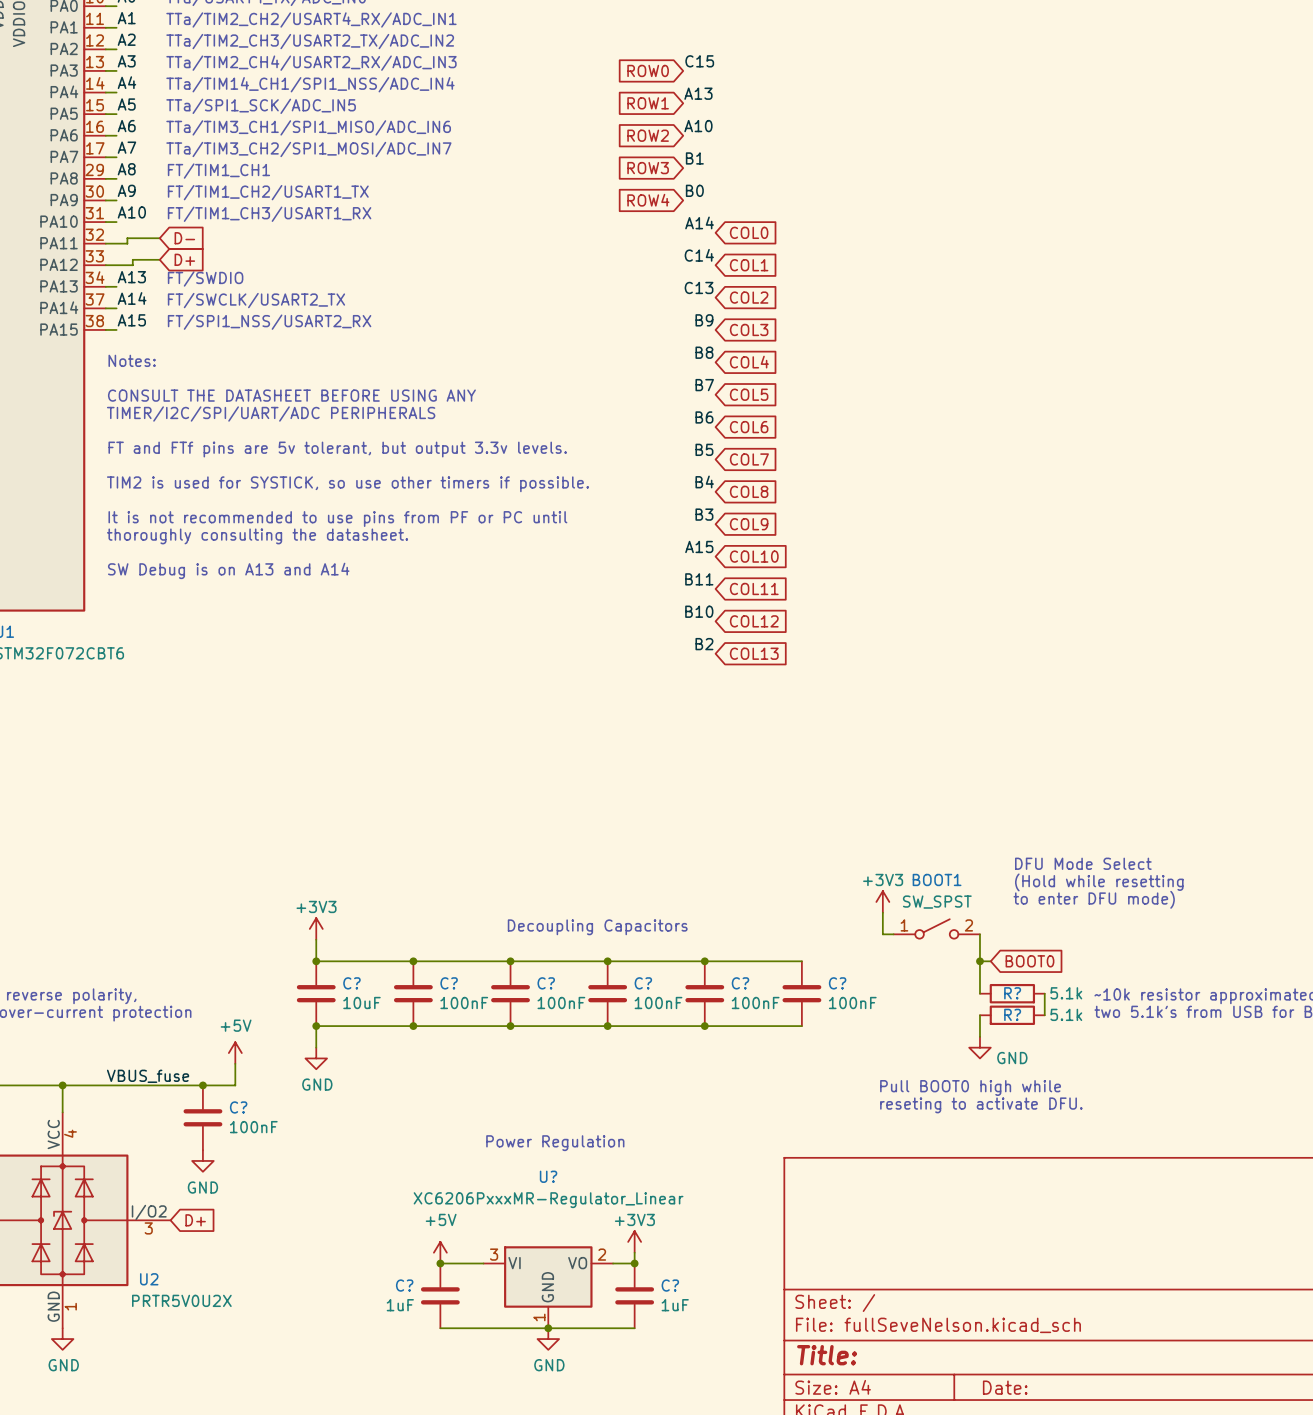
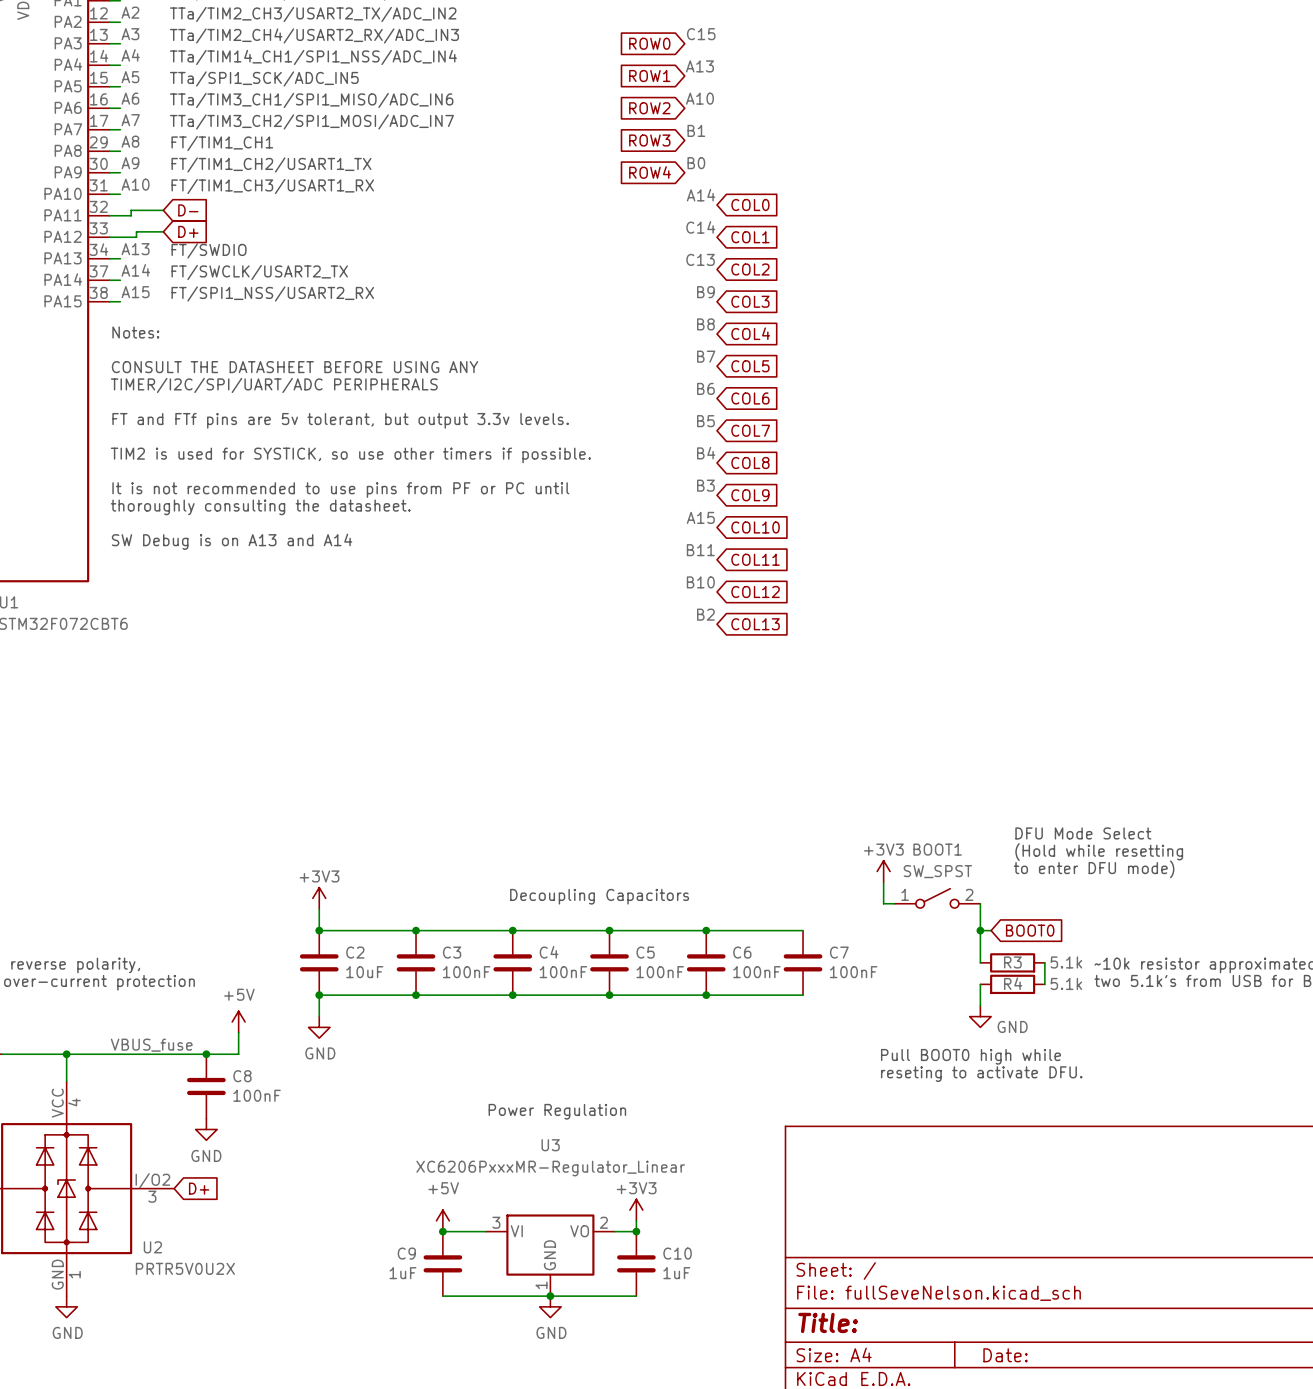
C? name: C? (351, 983) -> C2 (355, 952)
C? name: C? (449, 983) -> C3 (452, 952)
C? name: C? (546, 983) -> C4 (549, 952)
C? name: C? (643, 983) -> C5 (645, 952)
C? name: C? (740, 983) -> C6 (742, 952)
C? name: C? (837, 983) -> C7 (839, 952)
R? name: R? (1012, 993) -> R3 (1012, 962)
R? name: R? (1012, 1014) -> R4 (1013, 983)
C? name: C? (238, 1107) -> C8 (242, 1076)
U? name: U? (548, 1176) -> U3 (550, 1145)
C? name: C? (404, 1285) -> C9 (406, 1253)
C? name: C? (670, 1285) -> C10 (677, 1253)

